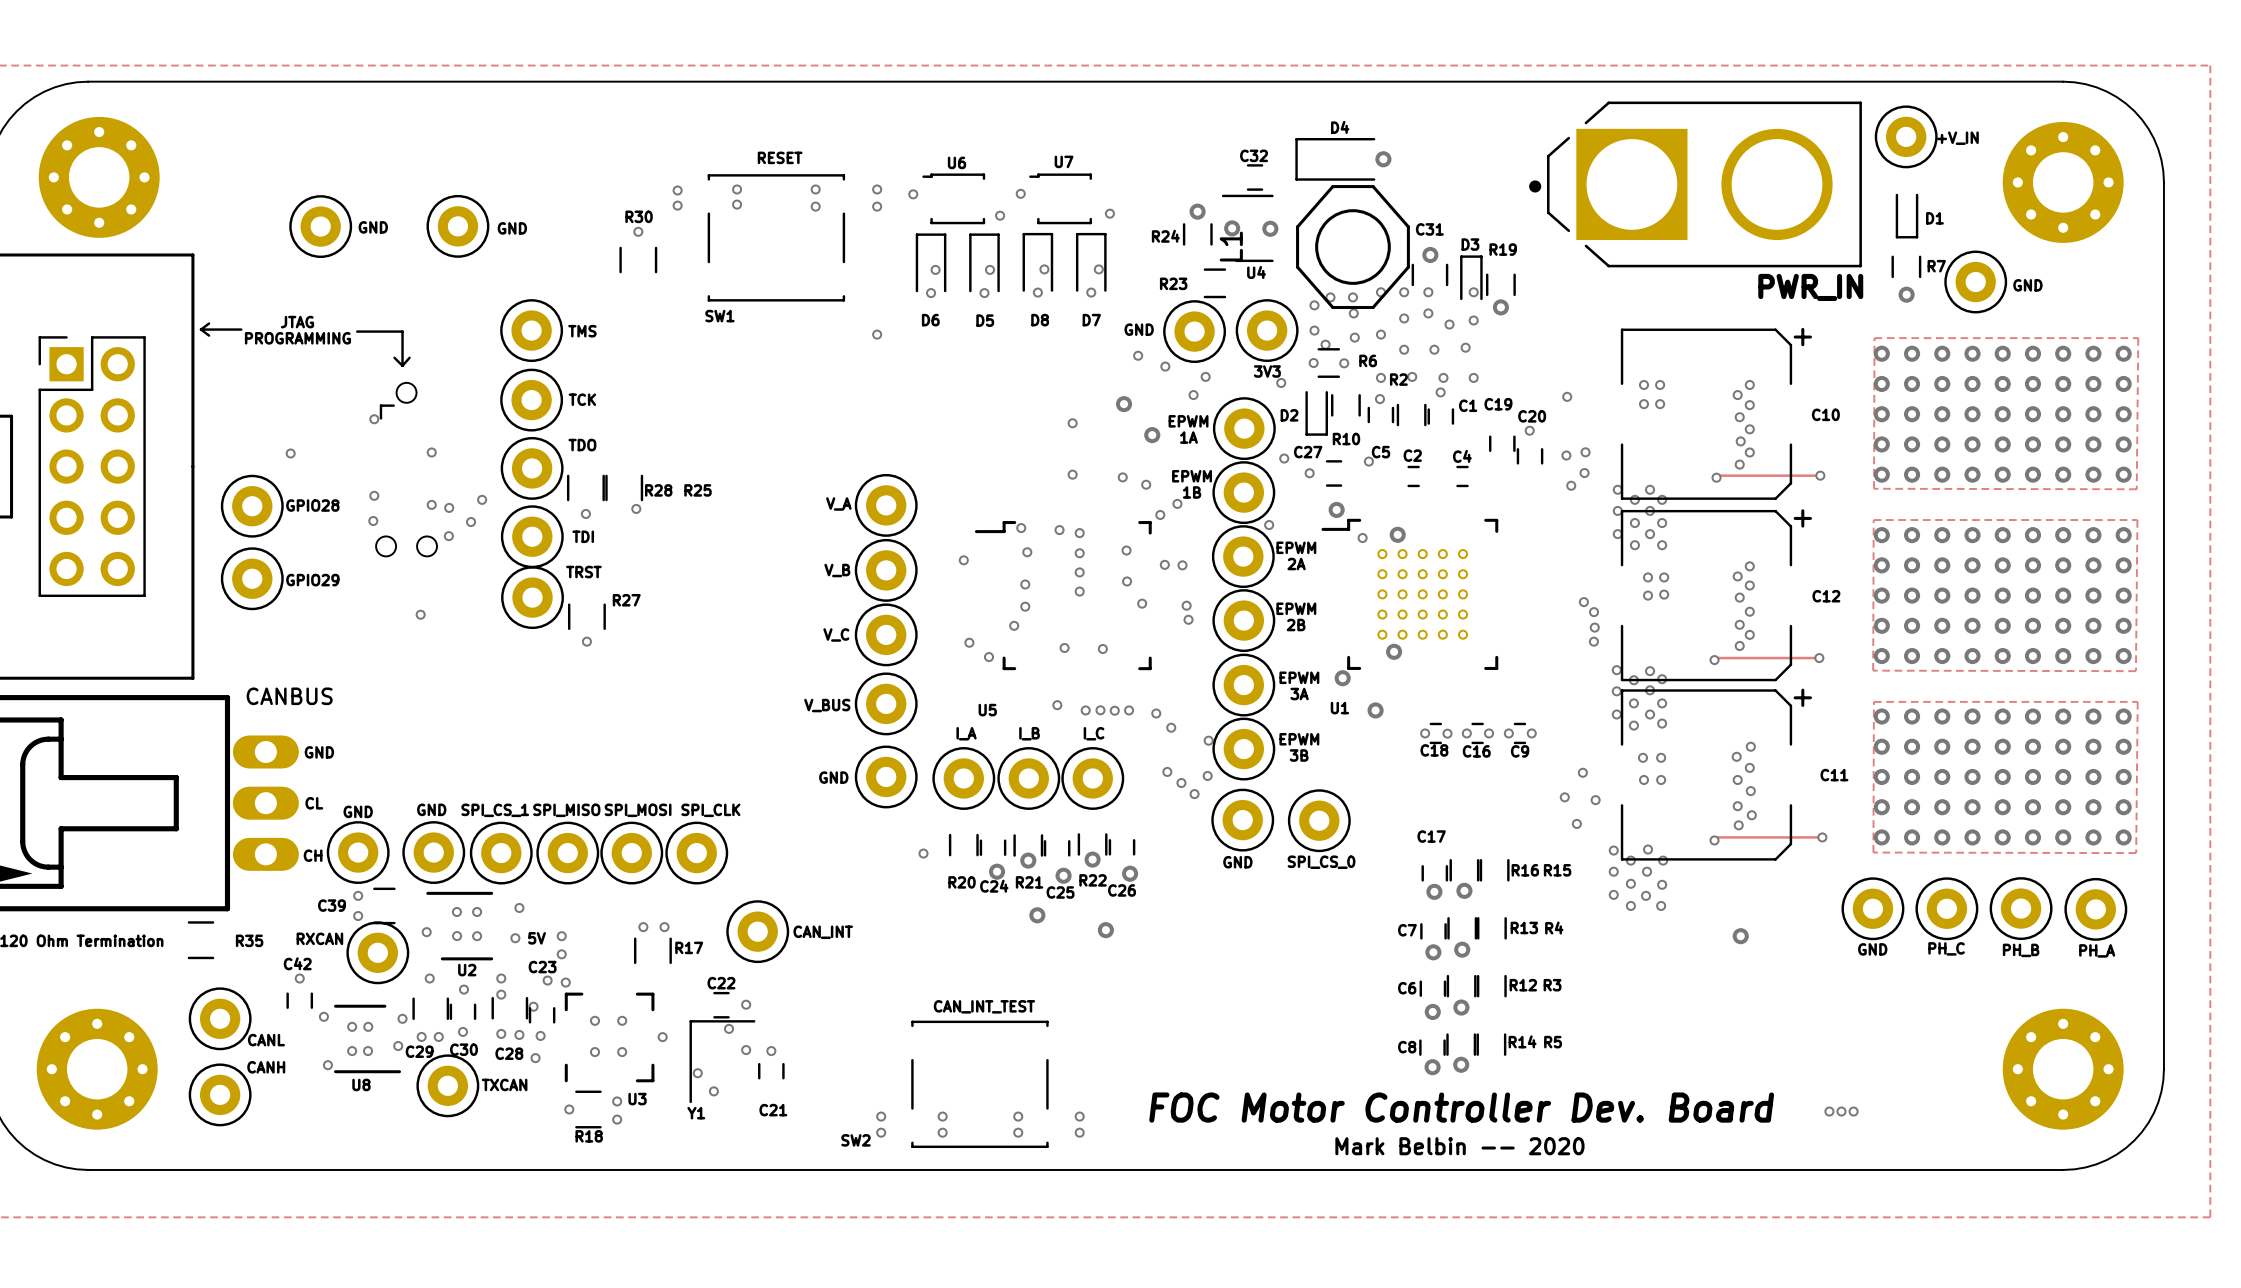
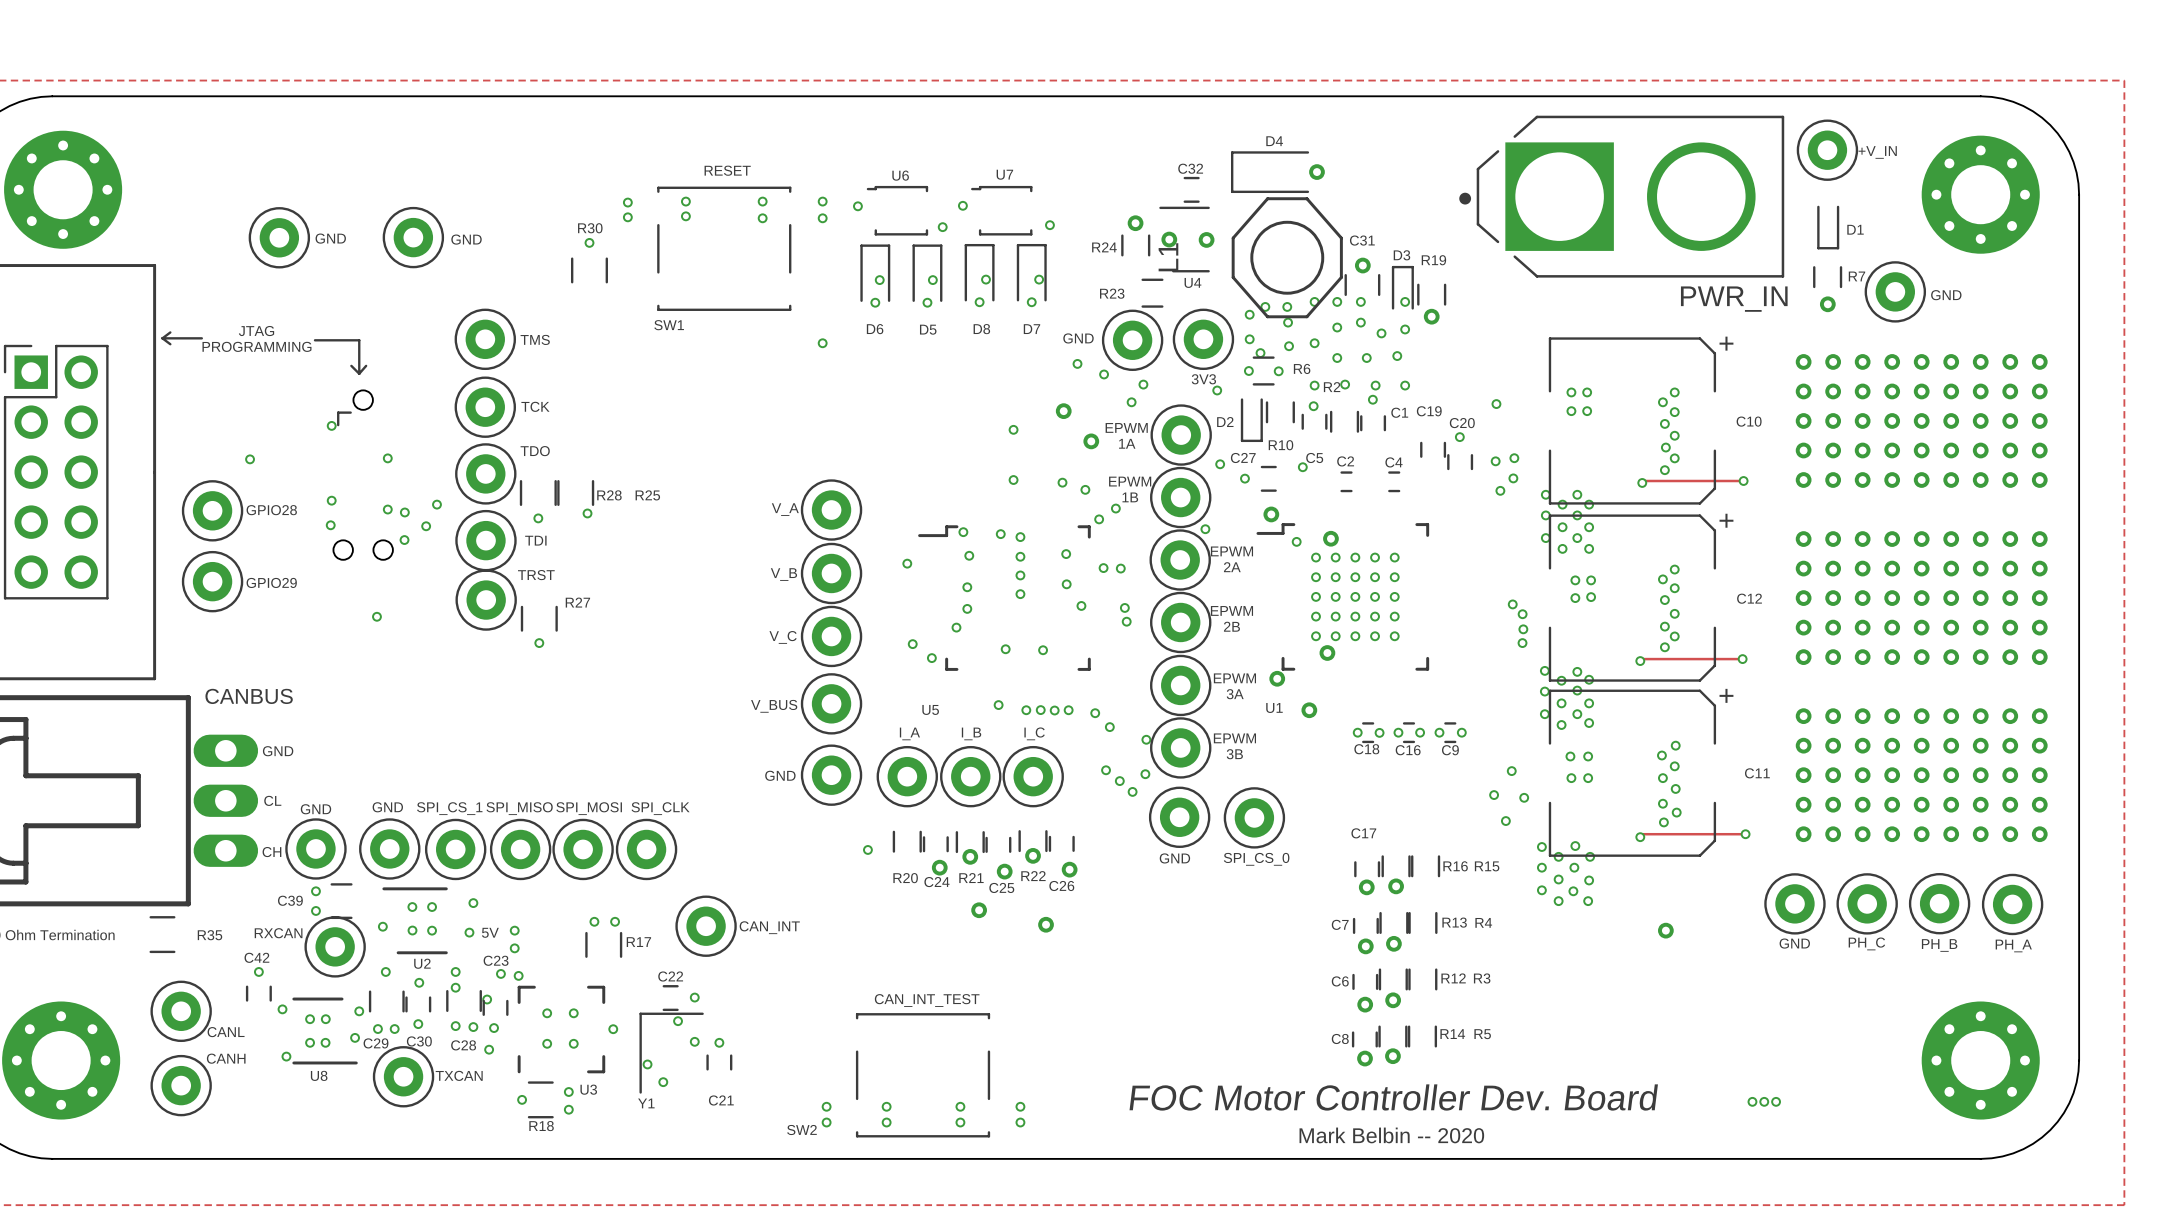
zone outline: (1874, 338) (1874, 488) (2136, 489) (2138, 338) (1874, 338) -> none
zone outline: (1873, 520) (1873, 670) (2135, 671) (2137, 520) (1873, 520) -> none
zone outline: (1873, 701) (1873, 852) (2136, 853) (2137, 701) (1873, 701) -> none

